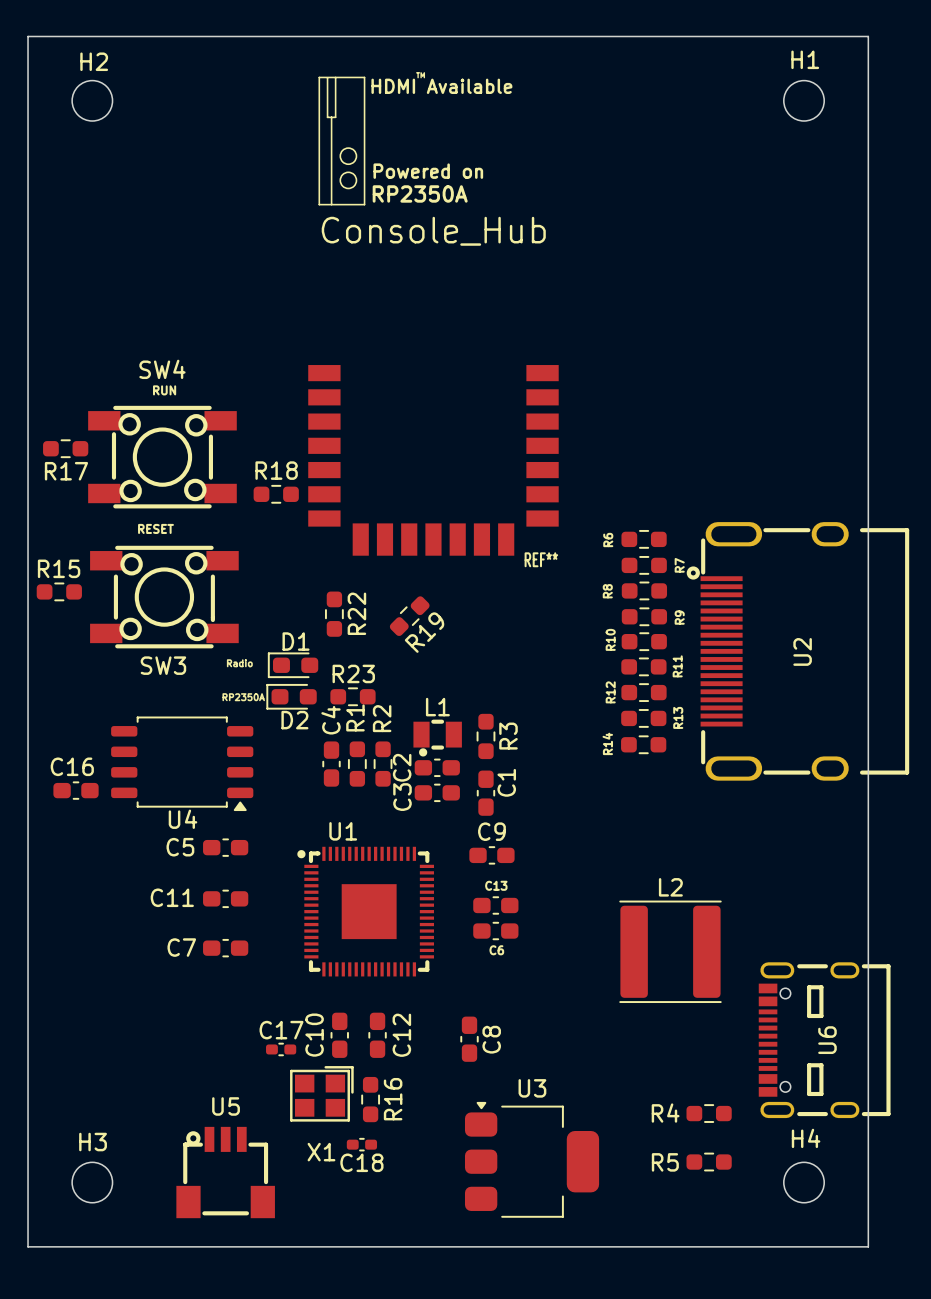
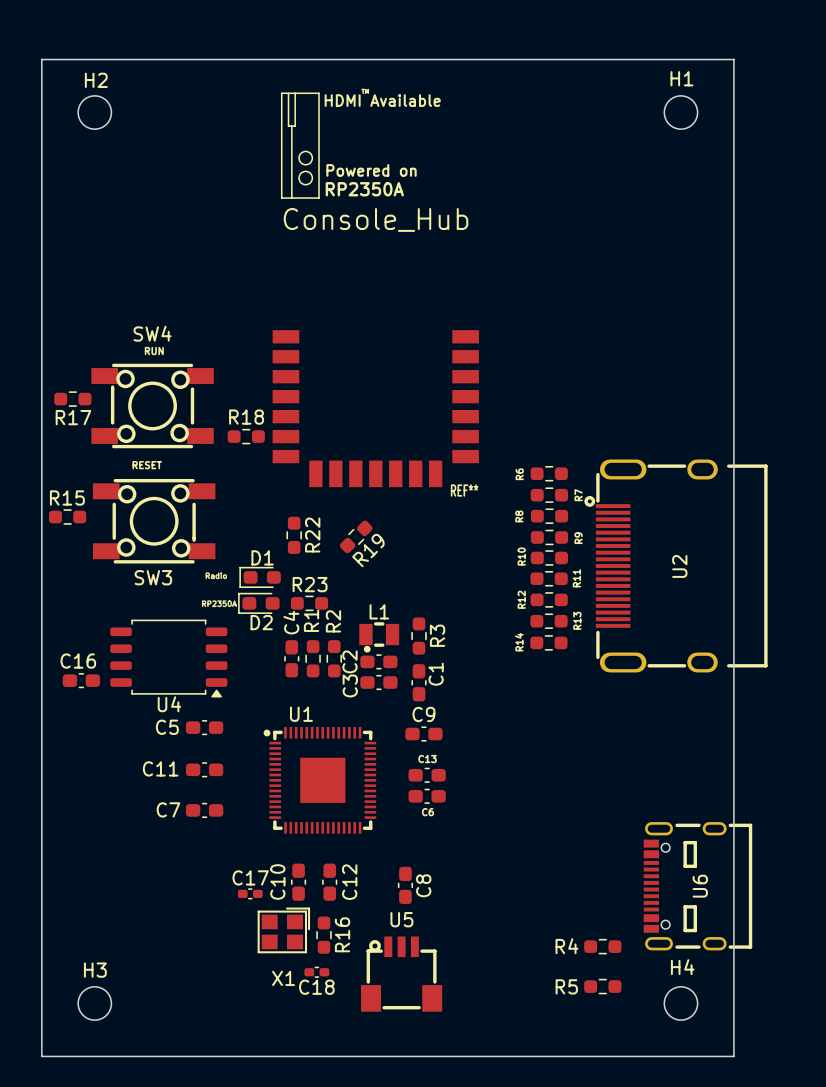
L2: (670, 951) -> none
U3: (532, 1159) -> none
U5 position: (225, 1172) -> (401, 974)

